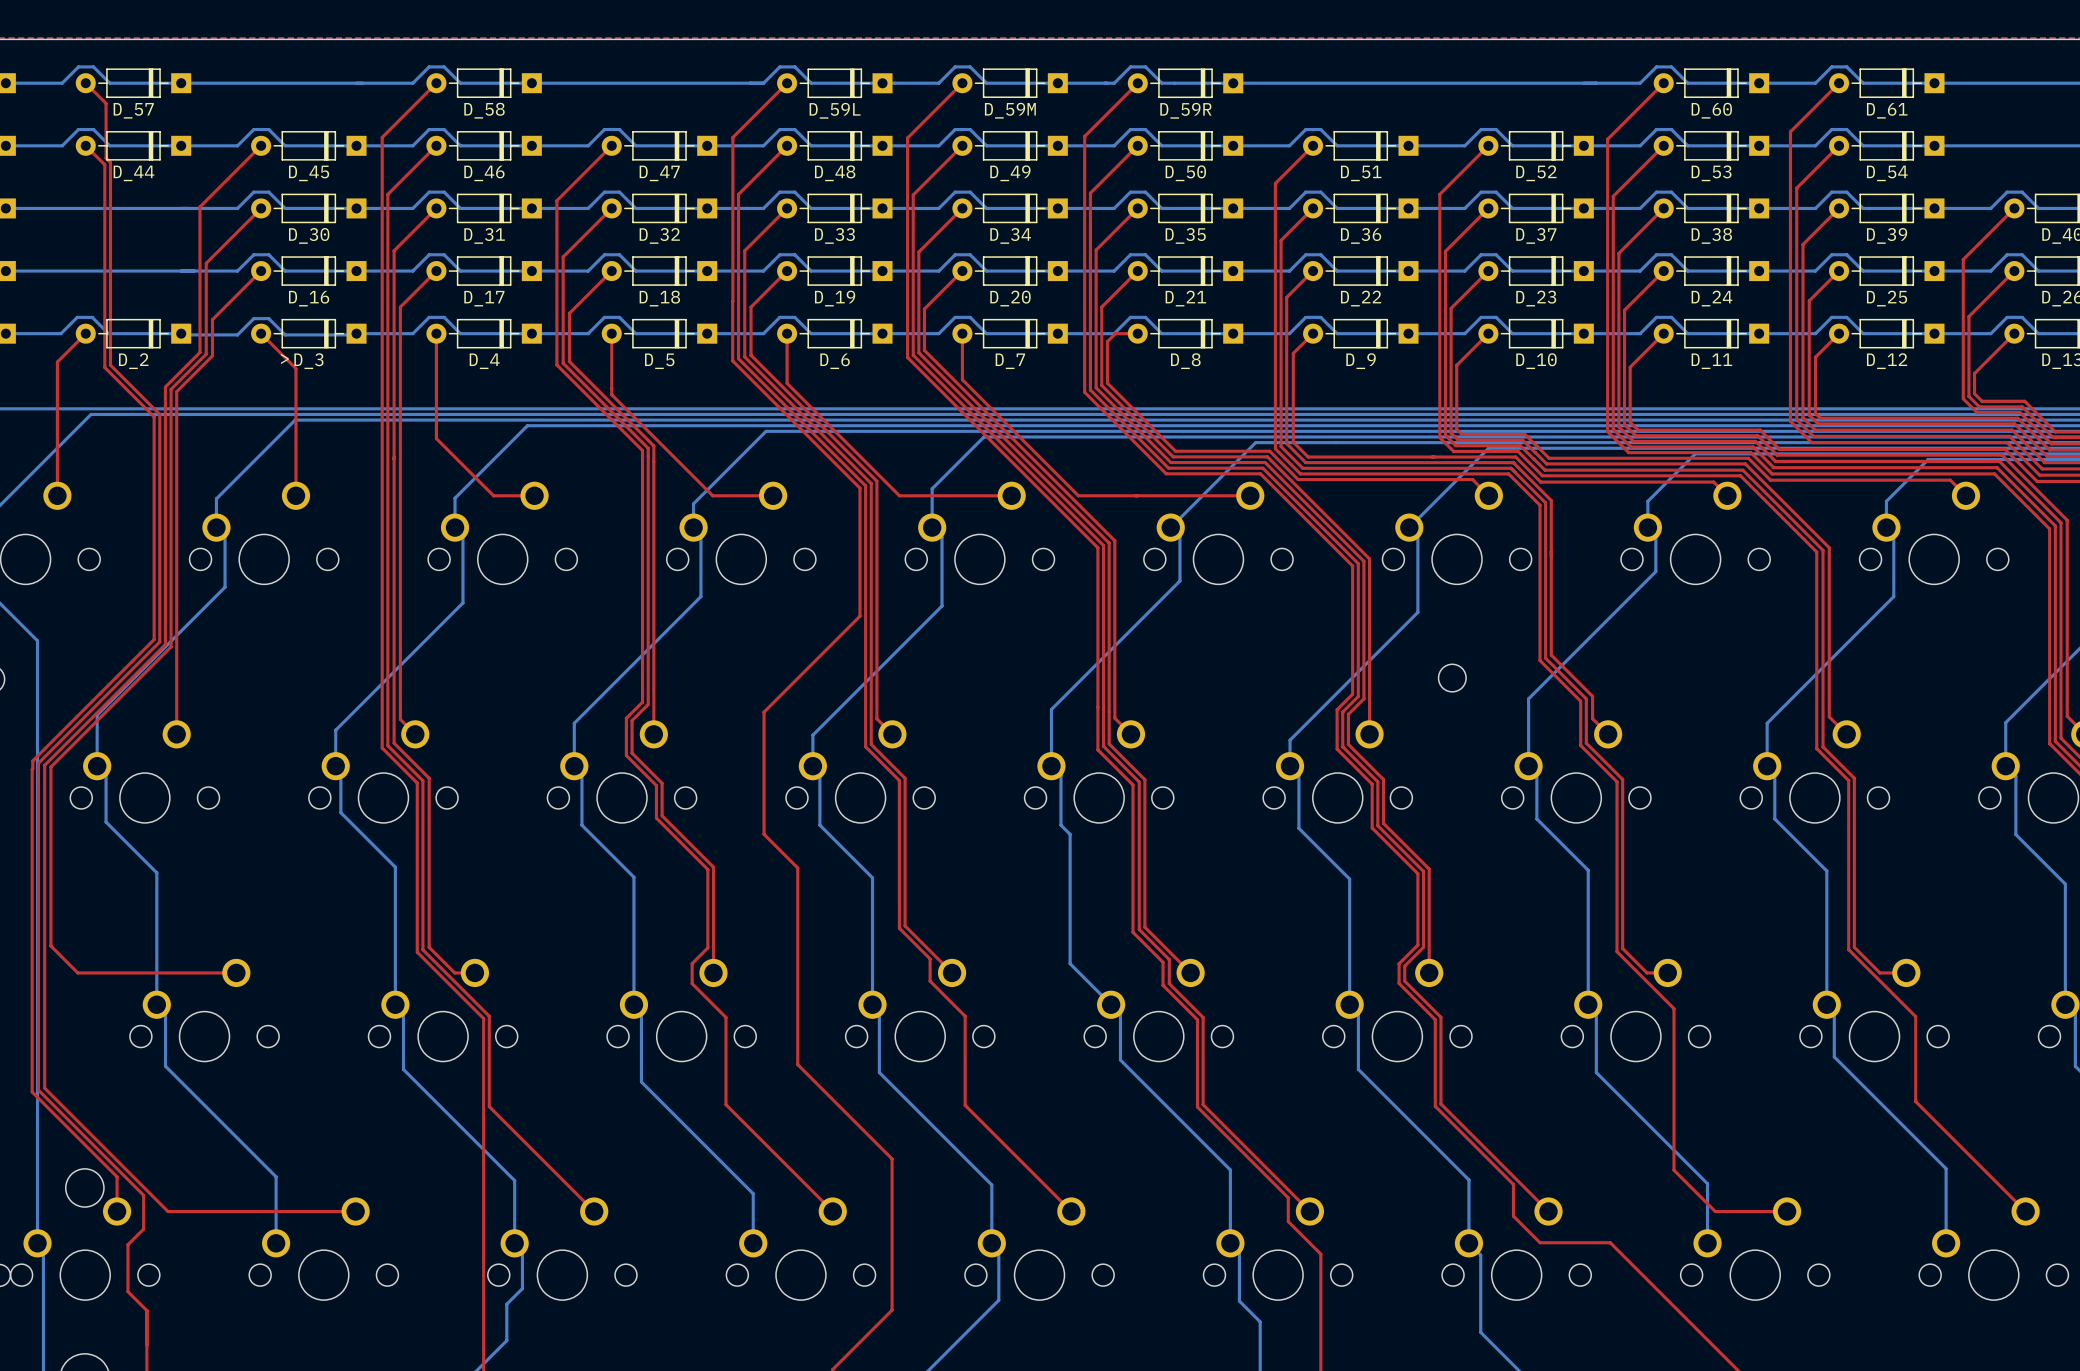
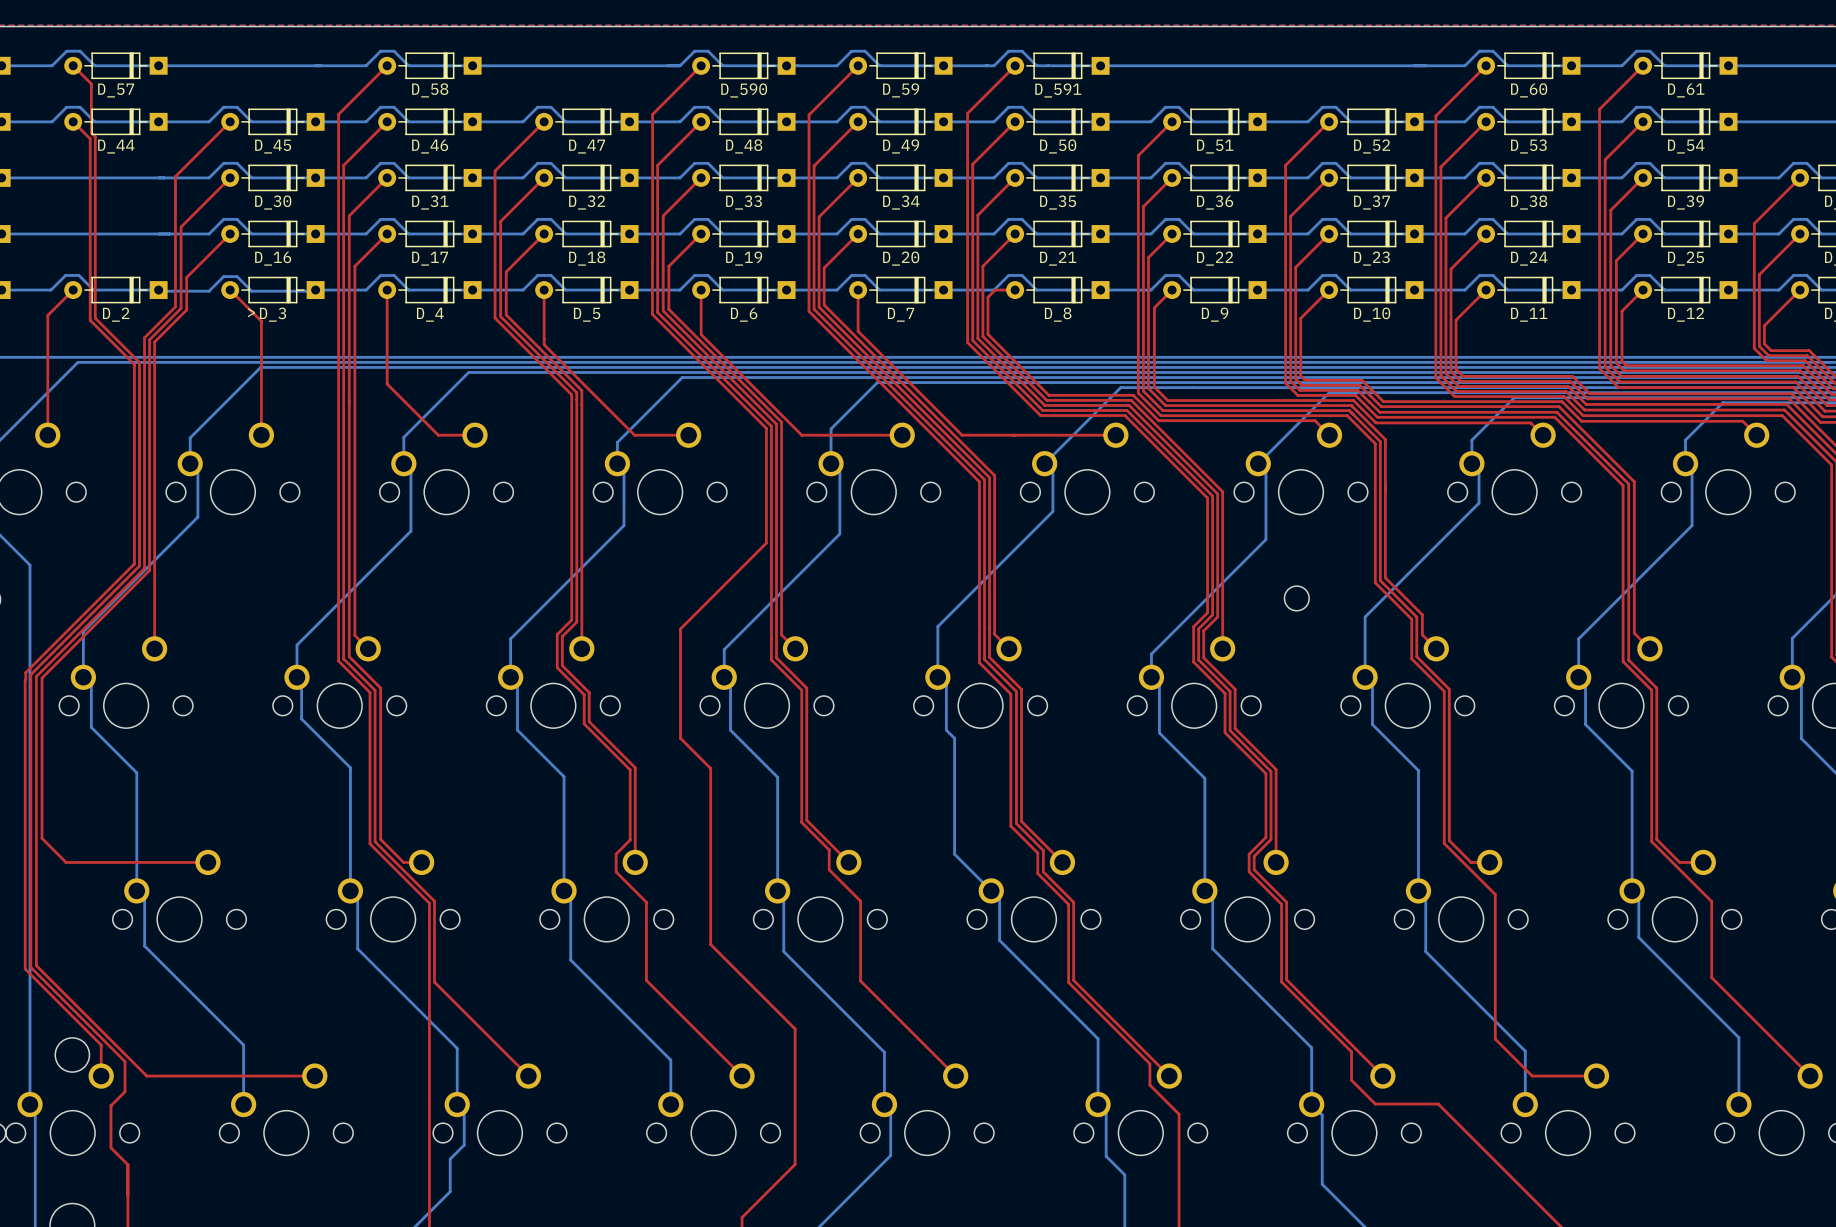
D_59L name: D_59L (835, 110) -> D_590 (744, 90)
D_59M name: D_59M (1010, 110) -> D_59 (901, 90)
D_59R name: D_59R (1185, 110) -> D_591 (1058, 90)

